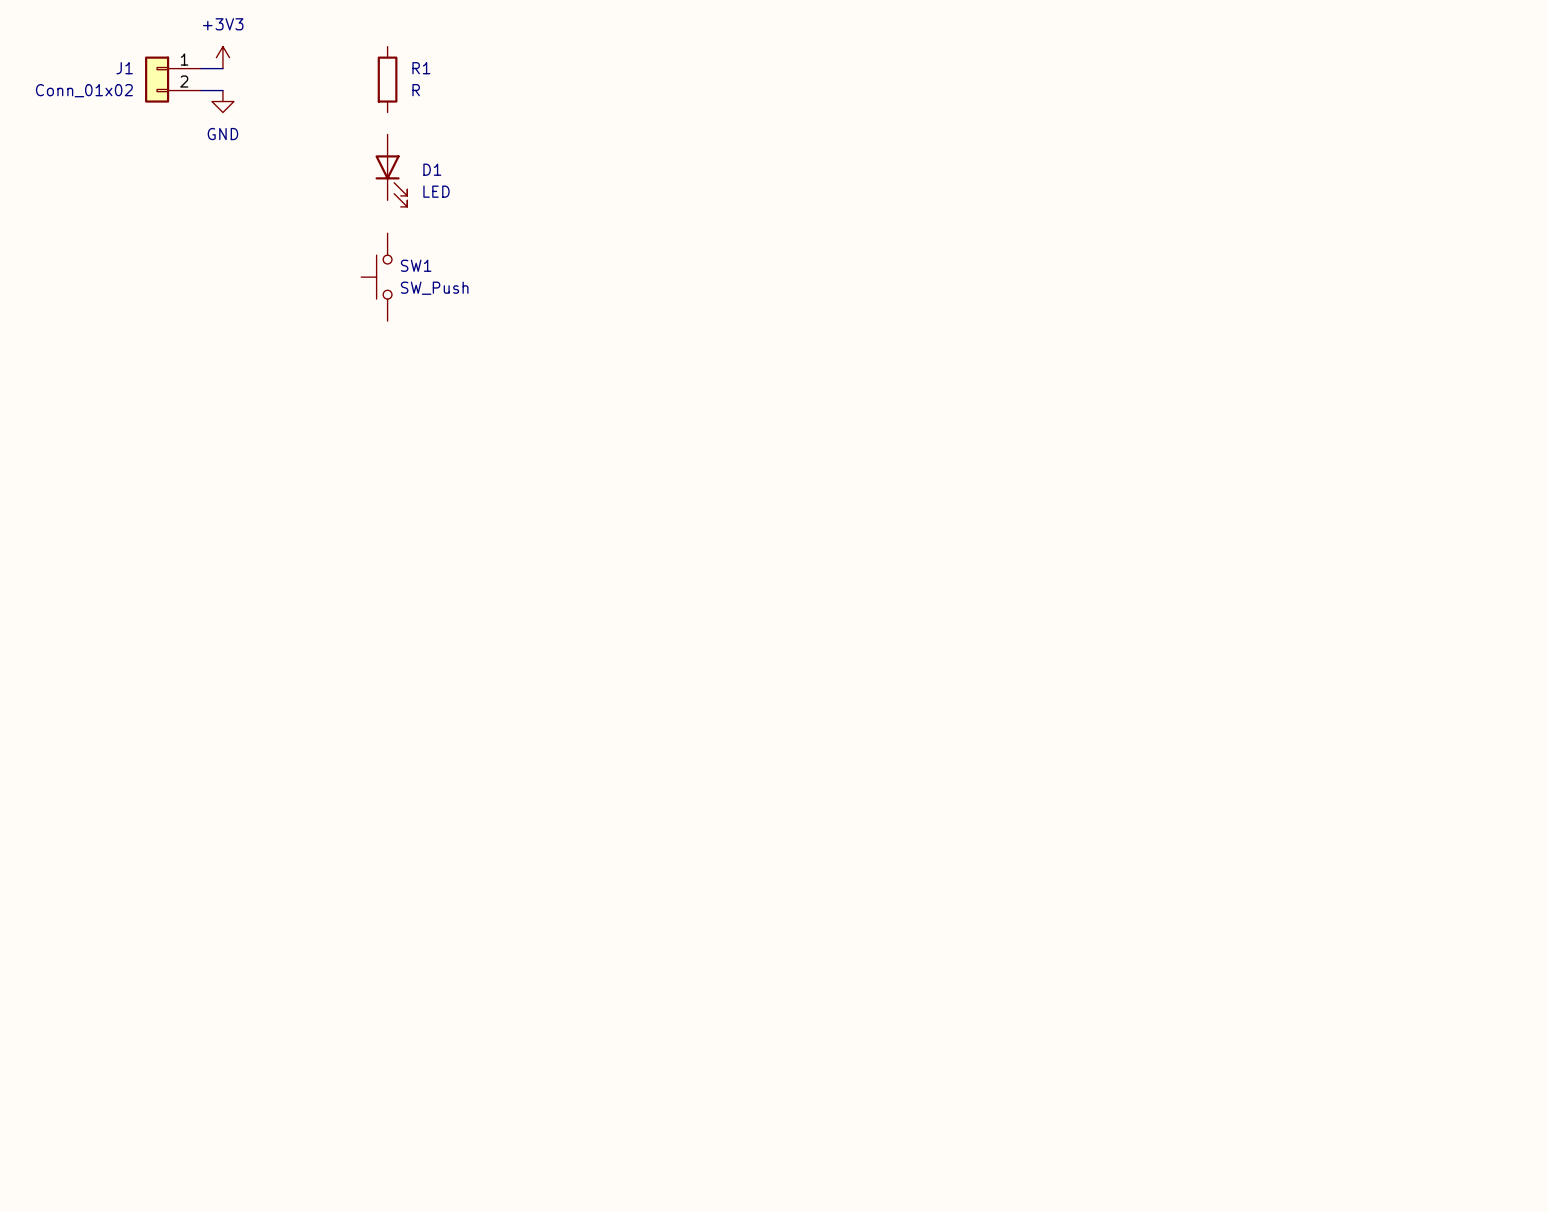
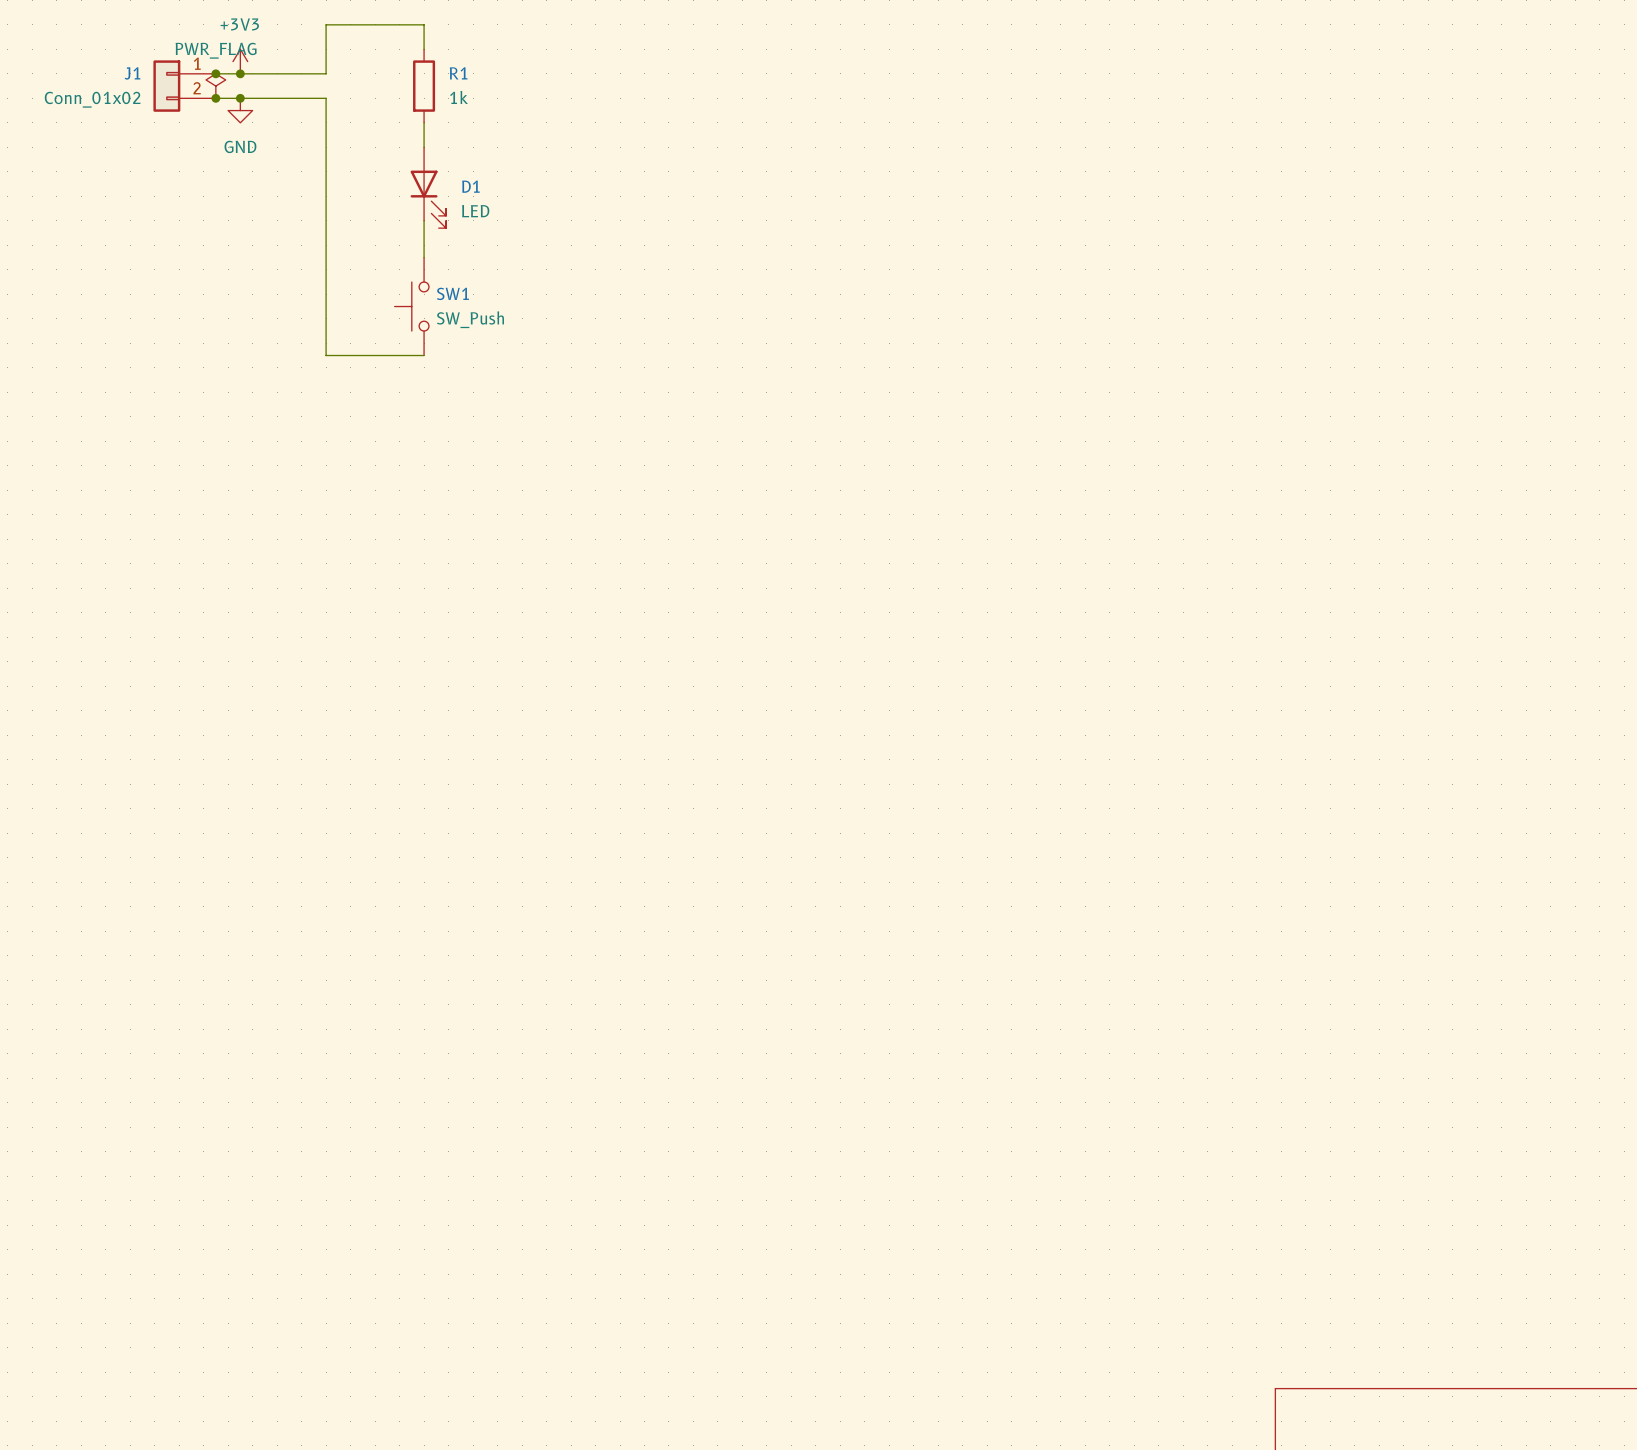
wire: none -> (424, 49) (424, 24) (326, 24) (326, 73) (240, 73)
junction: none -> (215, 73)
junction: none -> (240, 73)
power symbol: none -> PWR_FLAG (215, 86)
junction: none -> (215, 98)
wire: none -> (240, 98) (326, 98) (326, 355) (424, 355)
junction: none -> (240, 98)
R1 value: R (416, 90) -> 1k (459, 97)
wire: none -> (424, 122) (424, 147)
wire: none -> (424, 220) (424, 257)

